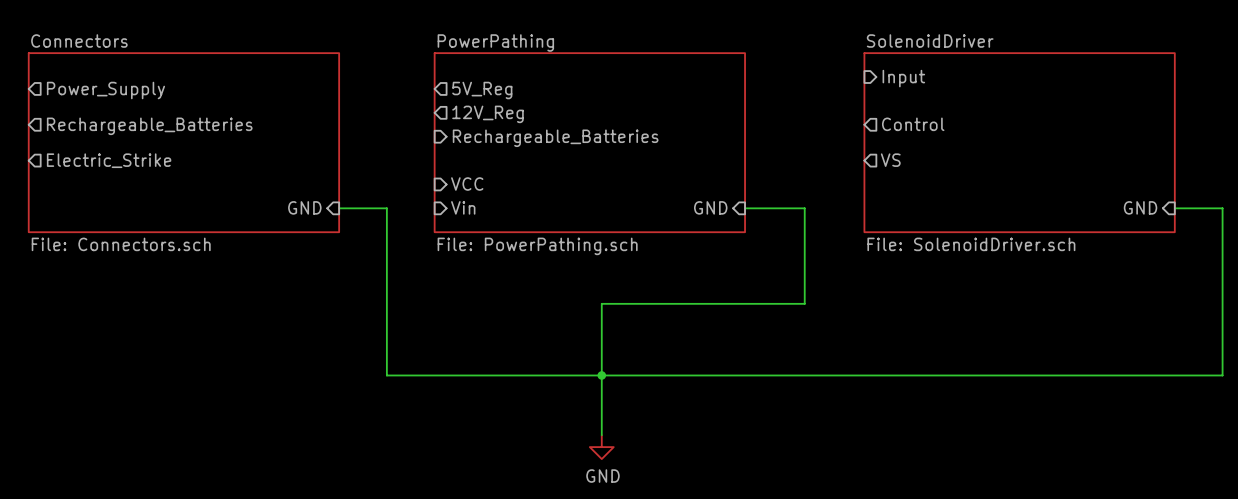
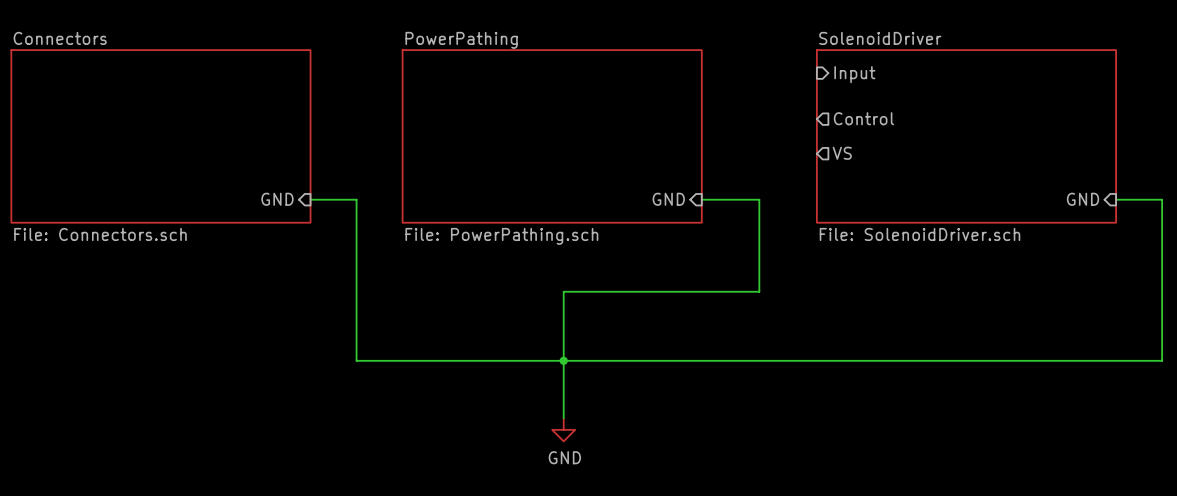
sheet pin: Power_Supply (105, 90) -> none
sheet pin: 5V_Reg (482, 90) -> none
sheet pin: 12V_Reg (487, 114) -> none
sheet pin: Rechargeable_Batteries (149, 126) -> none
sheet pin: Rechargeable_Batteries (555, 138) -> none
sheet pin: Electric_Strike (109, 160) -> none
sheet pin: VCC (467, 184) -> none
sheet pin: Vin (463, 207) -> none

